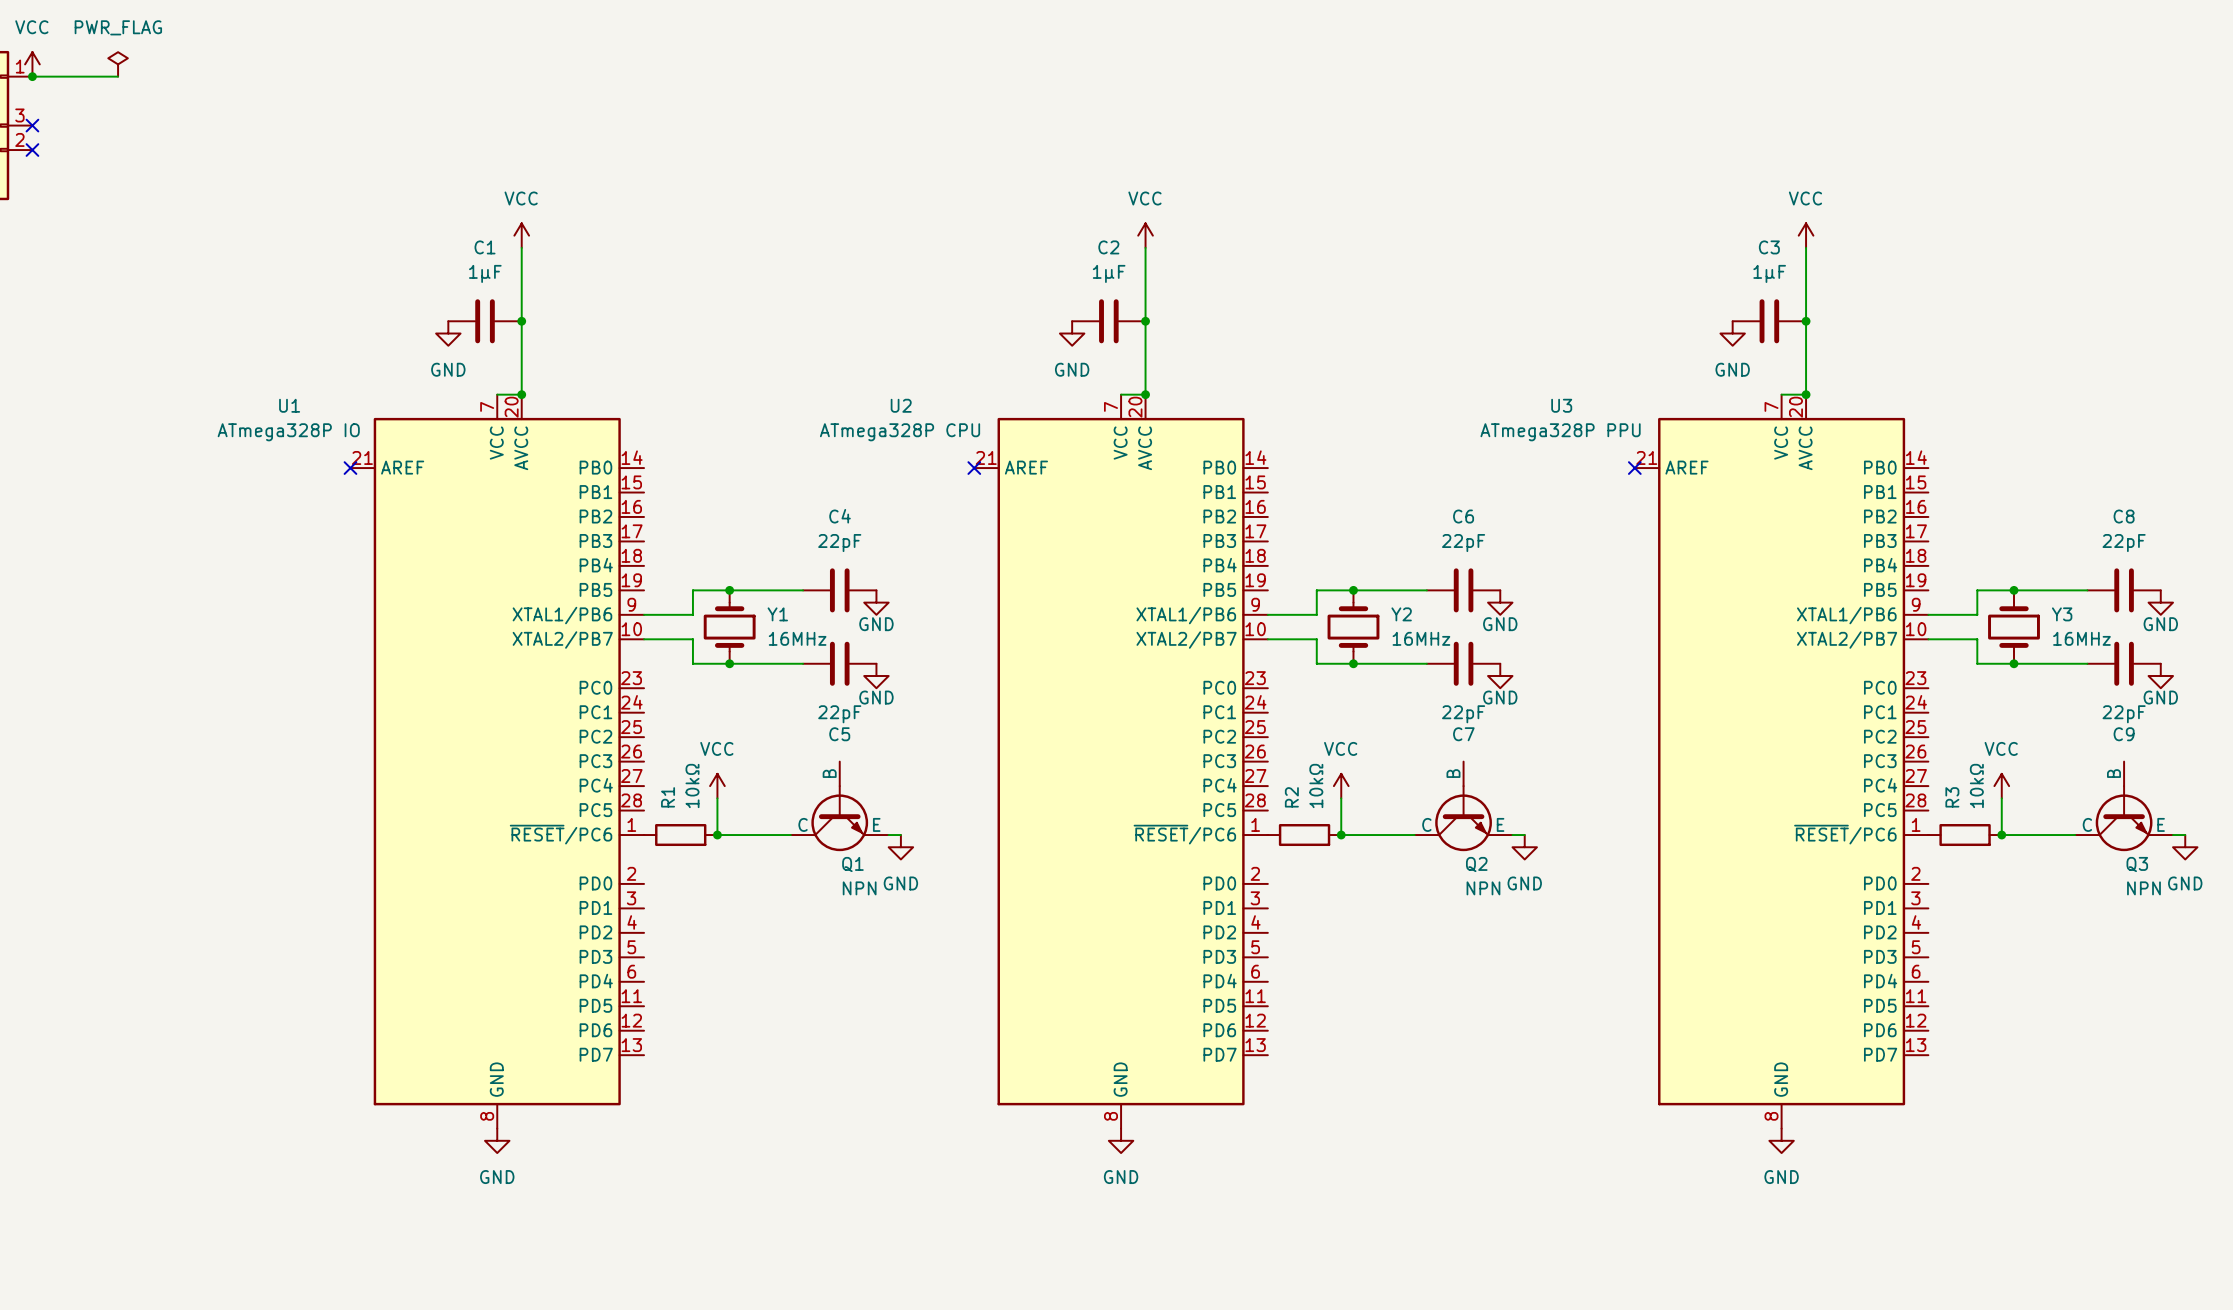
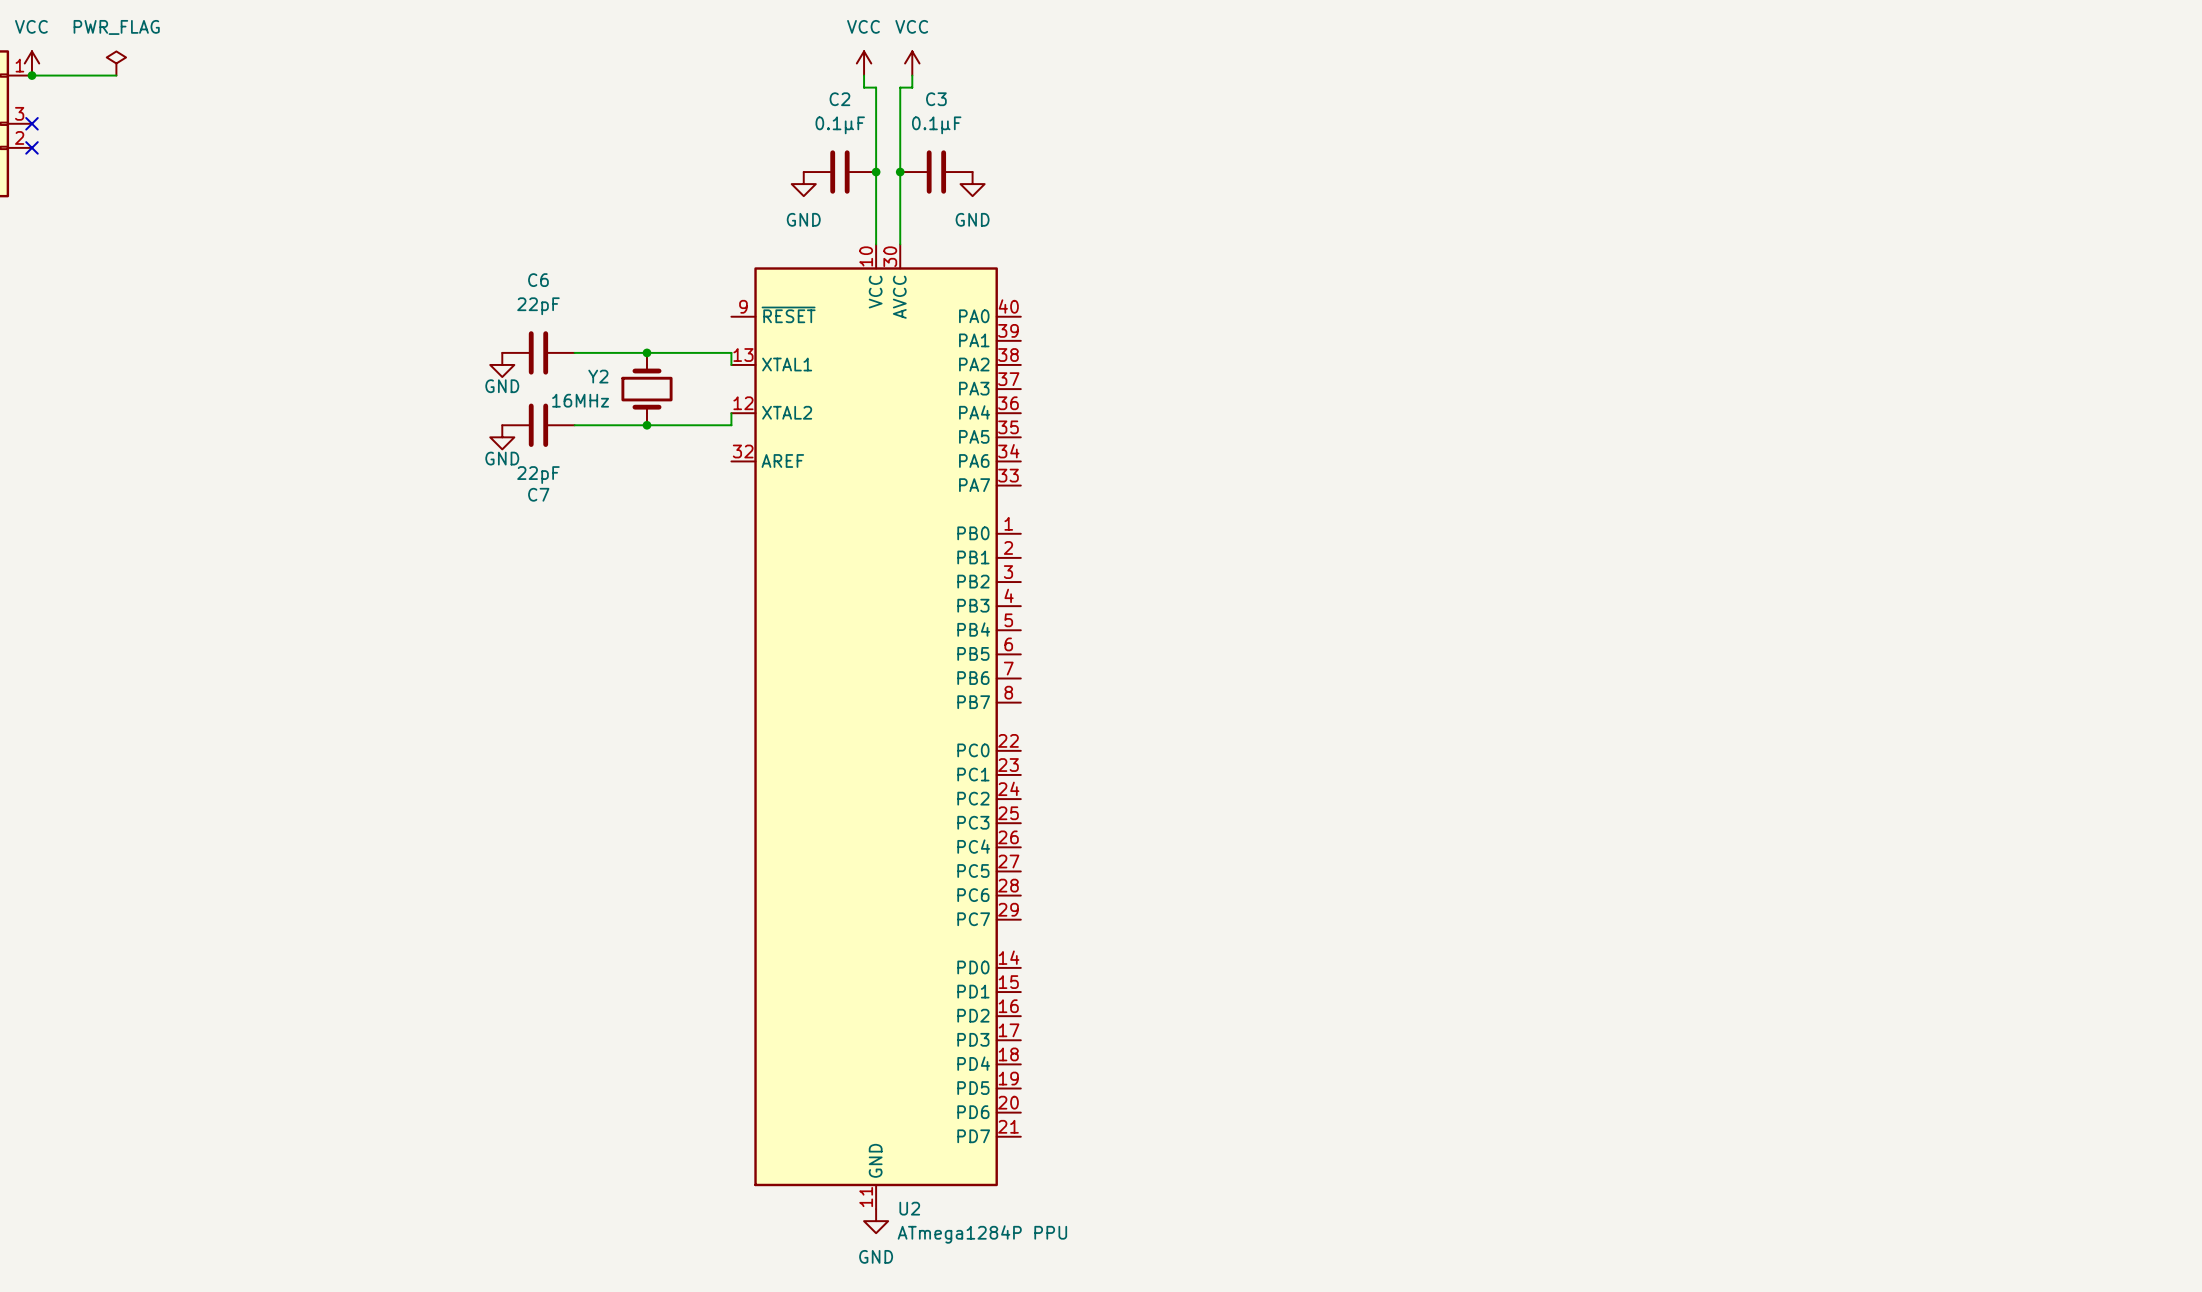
power symbol: none -> VCC (864, 63)
power symbol: none -> VCC (912, 63)
wire: none -> (864, 75) (864, 87) (876, 87) (876, 244)
wire: none -> (912, 75) (912, 87) (900, 87) (900, 244)
junction: none -> (876, 172)
junction: none -> (900, 172)
power symbol: none -> GND (803, 184)
power symbol: none -> GND (972, 184)
power symbol: VCC (521, 235) -> none
power symbol: VCC (1145, 235) -> none
power symbol: VCC (1806, 235) -> none
wire: (521, 247) (521, 394) (497, 394) -> none
wire: (1145, 247) (1145, 394) (1121, 394) -> none
wire: (1806, 247) (1806, 394) (1781, 394) -> none
C2 value: 1μF (1109, 273) -> 0.1μF (840, 125)
C3 value: 1μF (1769, 273) -> 0.1μF (936, 125)
C1: 1μF (485, 321) -> none
junction: (521, 321) -> none
C2 position: (1108, 321) -> (839, 172)
junction: (1145, 321) -> none
C3 position: (1769, 321) -> (936, 172)
junction: (1806, 321) -> none
power symbol: GND (448, 333) -> none
power symbol: GND (1072, 333) -> none
power symbol: GND (1732, 333) -> none
wire: none -> (574, 352) (731, 352) (731, 364)
junction: none -> (646, 352)
power symbol: none -> GND (502, 364)
junction: (521, 394) -> none
U2 symbol: [974, 394, 1268, 1129] -> [731, 244, 1021, 1210]
junction: (1145, 394) -> none
junction: (1806, 394) -> none
U2 name position: U2 (901, 405) -> U2 (909, 1208)
wire: none -> (731, 413) (731, 425) (574, 425)
junction: none -> (646, 425)
U2 value: ATmega328P CPU (900, 432) -> ATmega1284P PPU (982, 1234)
power symbol: none -> GND (502, 437)
no-connect mark: (350, 468) -> none
no-connect mark: (974, 468) -> none
no-connect mark: (1634, 468) -> none
junction: (729, 590) -> none
wire: (803, 590) (692, 590) (692, 614) (644, 614) -> none
C4: 22pF (839, 590) -> none
junction: (1353, 590) -> none
wire: (1426, 590) (1316, 590) (1316, 614) (1267, 614) -> none
C6 position: (1463, 590) -> (538, 352)
junction: (2014, 590) -> none
wire: (2087, 590) (1977, 590) (1977, 614) (1928, 614) -> none
C8: 22pF (2124, 590) -> none
power symbol: GND (876, 602) -> none
power symbol: GND (1500, 602) -> none
power symbol: GND (2160, 602) -> none
Y2 name position: Y2 (1401, 614) -> Y2 (598, 376)
Y1: 16MHz (729, 627) -> none
Y2 position: (1353, 627) -> (646, 389)
Y3: 16MHz (2014, 627) -> none
Y2 value position: 16MHz (1421, 638) -> 16MHz (580, 400)
wire: (644, 639) (692, 639) (692, 663) (803, 663) -> none
wire: (1267, 639) (1316, 639) (1316, 663) (1426, 663) -> none
wire: (1928, 639) (1977, 639) (1977, 663) (2087, 663) -> none
junction: (729, 663) -> none
C5: 22pF (839, 663) -> none
junction: (1353, 663) -> none
C7 position: (1463, 663) -> (538, 425)
junction: (2014, 663) -> none
C9: 22pF (2124, 663) -> none
power symbol: GND (876, 676) -> none
power symbol: GND (1500, 676) -> none
power symbol: GND (2160, 676) -> none
U1: ATmega328P IO (497, 761) -> none
U3: ATmega328P PPU (1781, 761) -> none
power symbol: VCC (717, 786) -> none
power symbol: VCC (1341, 786) -> none
power symbol: VCC (2001, 786) -> none
wire: (717, 798) (717, 835) (790, 835) -> none
wire: (1341, 798) (1341, 835) (1414, 835) -> none
wire: (2001, 798) (2001, 835) (2075, 835) -> none
Q1: NPN (839, 806) -> none
Q2: NPN (1463, 806) -> none
Q3: NPN (2124, 806) -> none
R1: 10kΩ (680, 835) -> none
junction: (717, 835) -> none
R2: 10kΩ (1304, 835) -> none
junction: (1341, 835) -> none
wire: (1512, 835) (1524, 835) -> none
R3: 10kΩ (1965, 835) -> none
junction: (2001, 835) -> none
wire: (2173, 835) (2185, 835) -> none
power symbol: GND (900, 847) -> none
power symbol: GND (1524, 847) -> none
power symbol: GND (2185, 847) -> none
power symbol: GND (497, 1140) -> none
power symbol: GND (1121, 1140) -> none
power symbol: GND (1781, 1140) -> none
power symbol: none -> GND (876, 1221)

